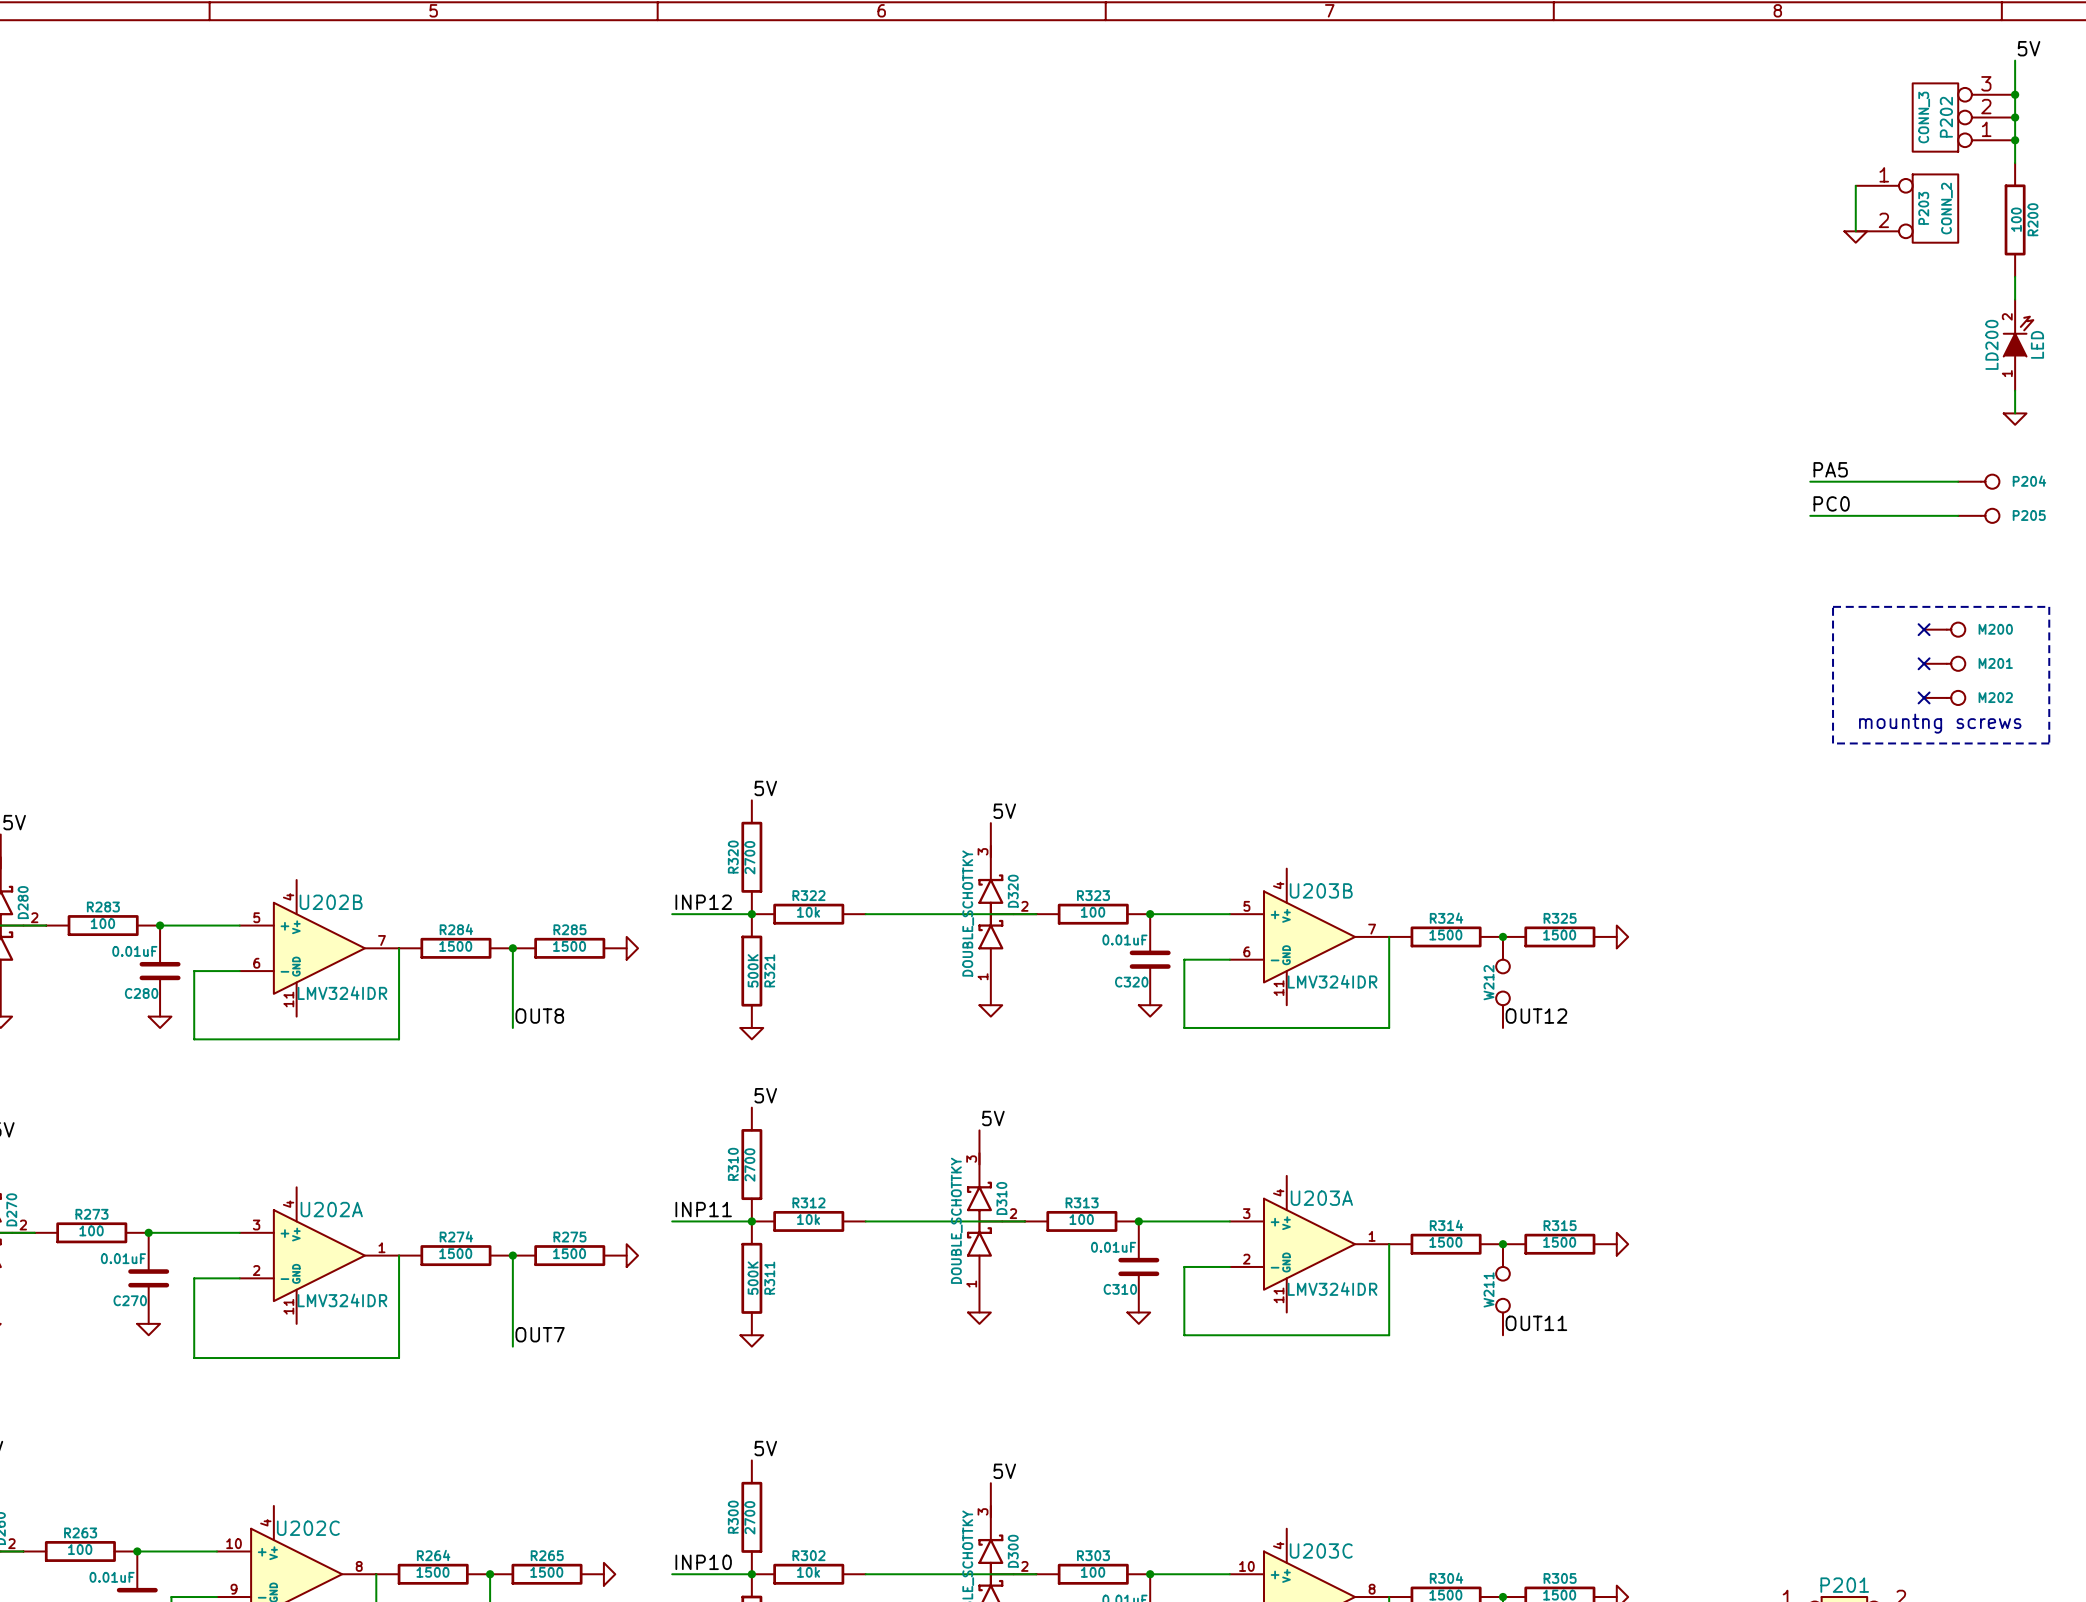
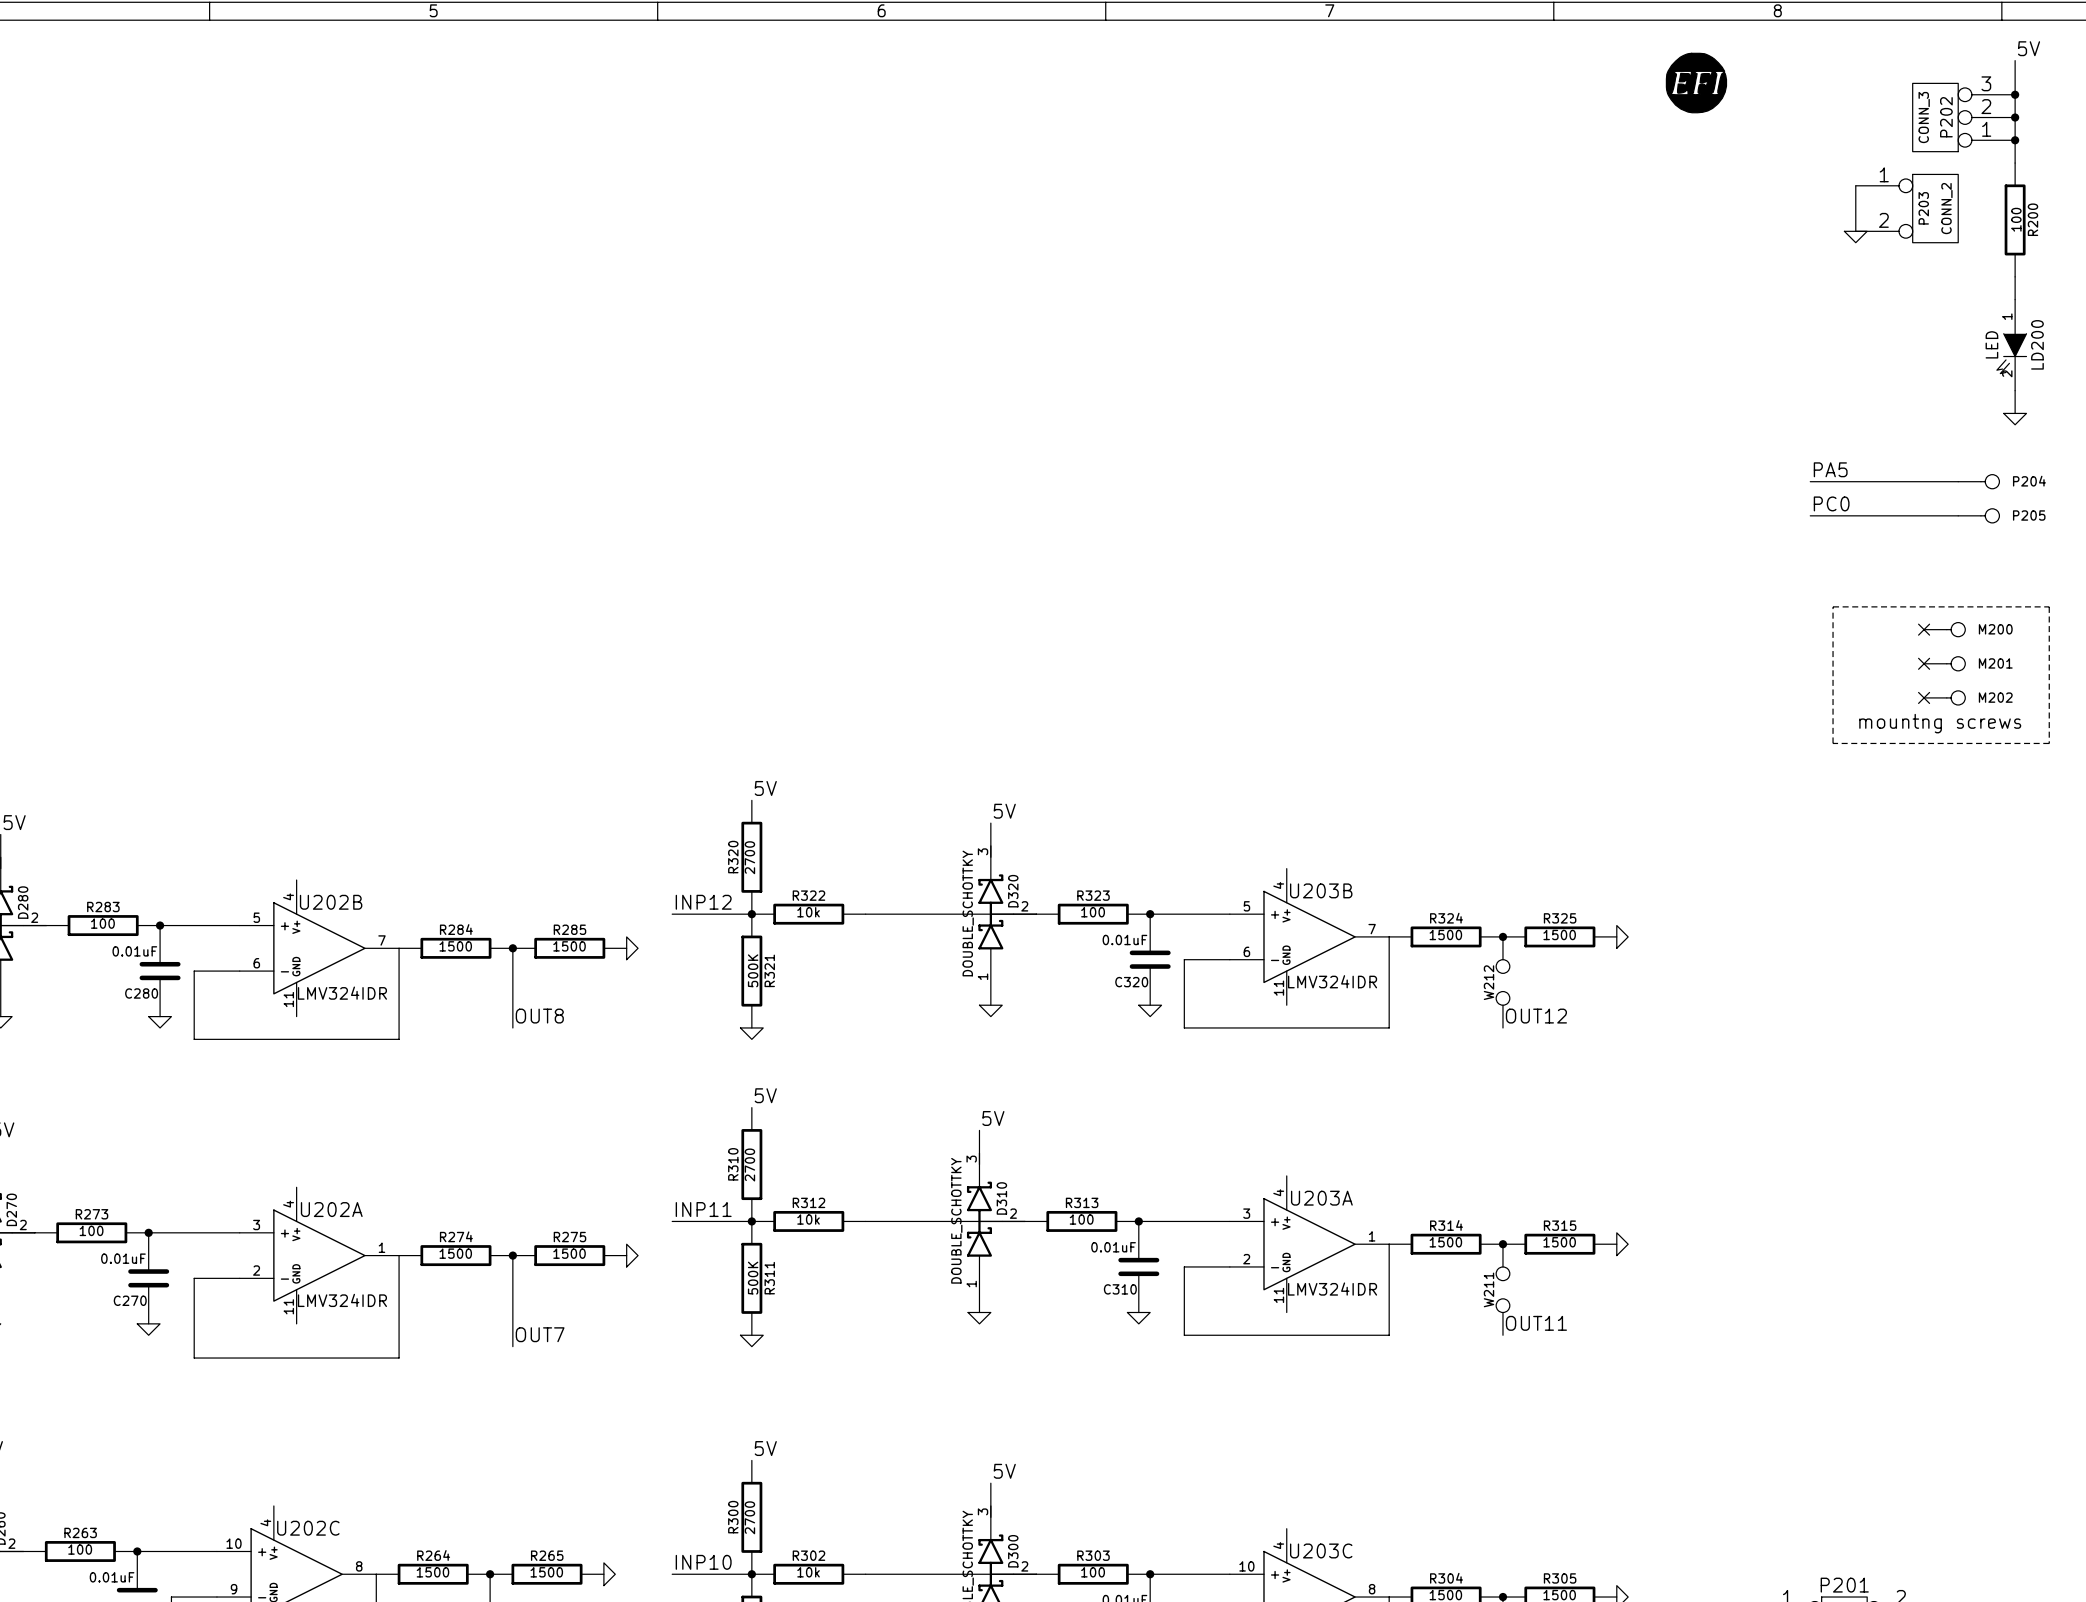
part: none -> (1696, 83)
LD200 rotation: 0° (2018, 336) -> 180° (2011, 353)

